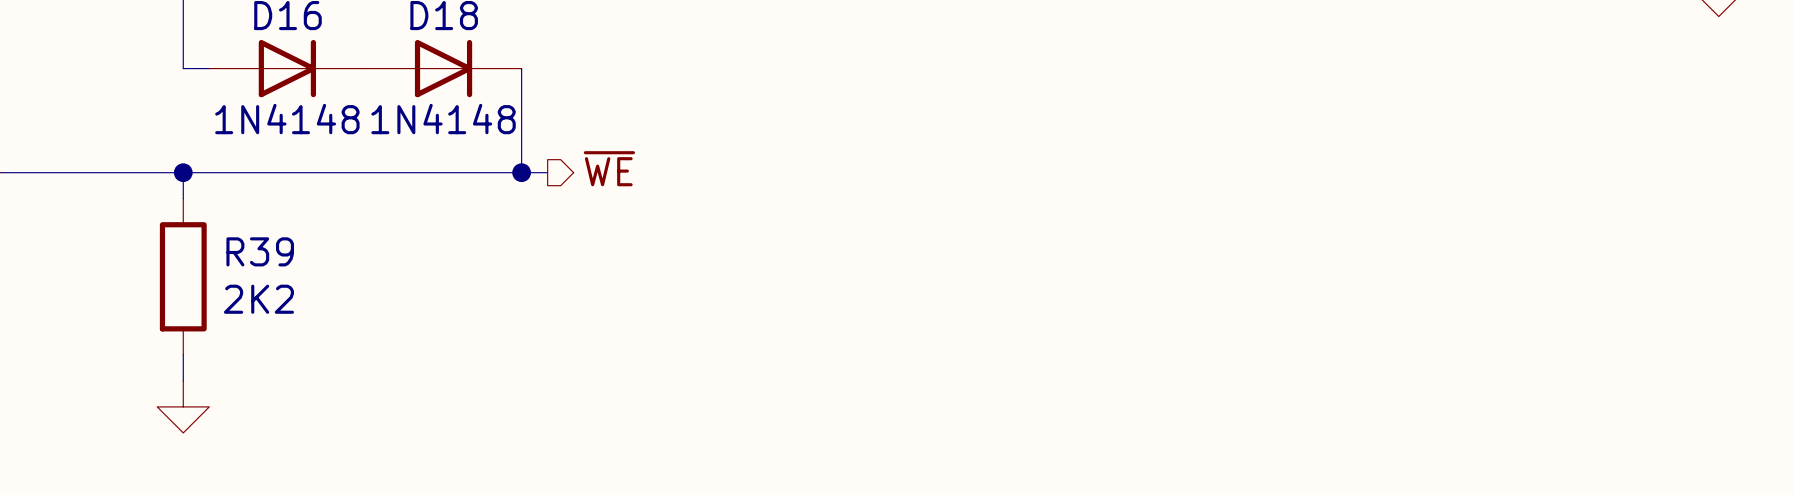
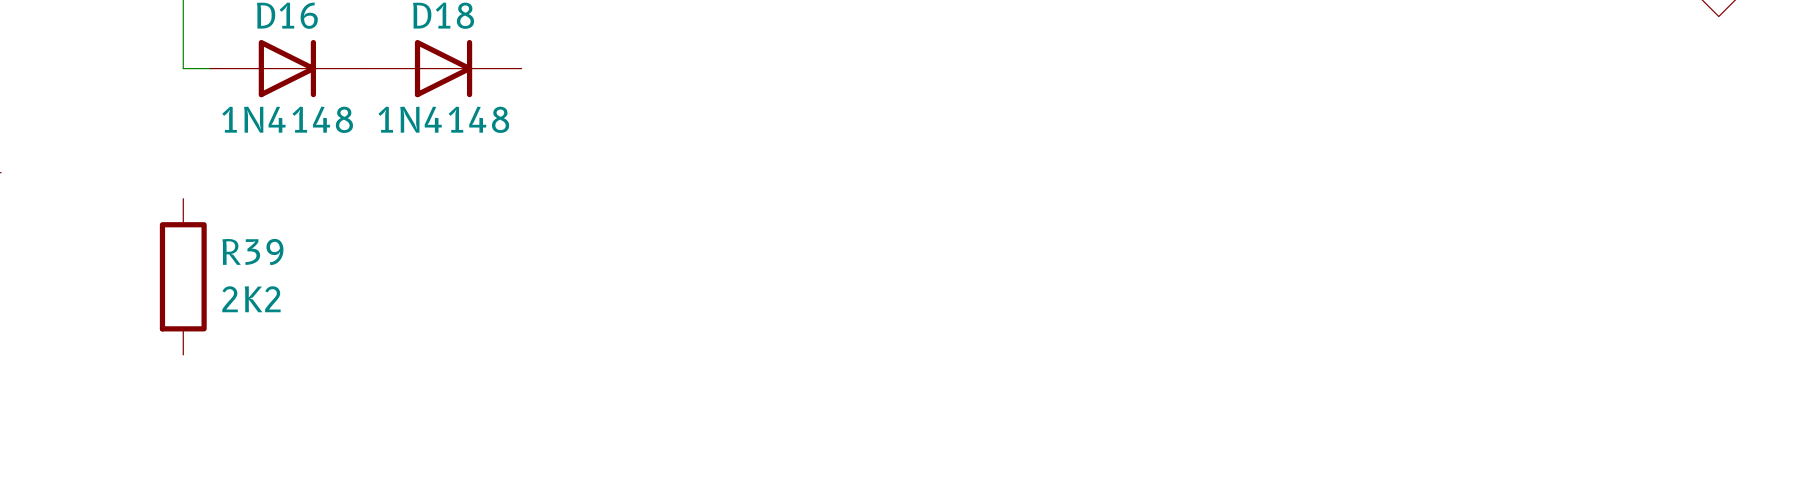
wire: (521, 68) (521, 172) -> none
hierarchical label: ~{WE} (609, 168) -> none
wire: (1, 172) (547, 172) -> none
wire: (183, 172) (183, 198) -> none
junction: (183, 172) -> none
junction: (521, 172) -> none
wire: (183, 354) (183, 380) -> none
power symbol: (183, 406) -> none

